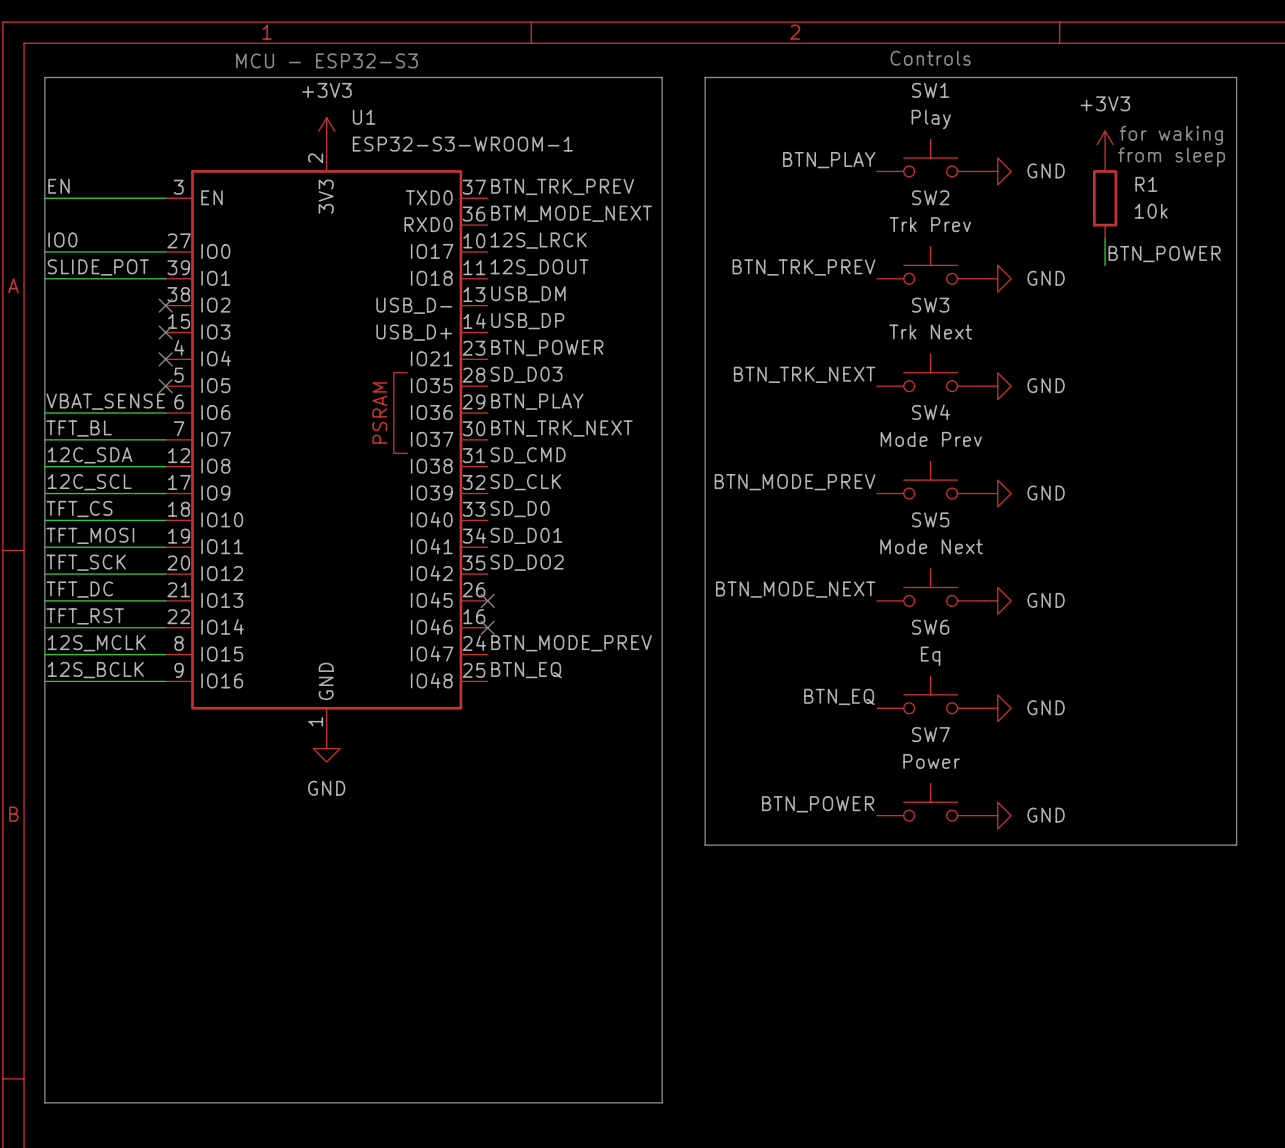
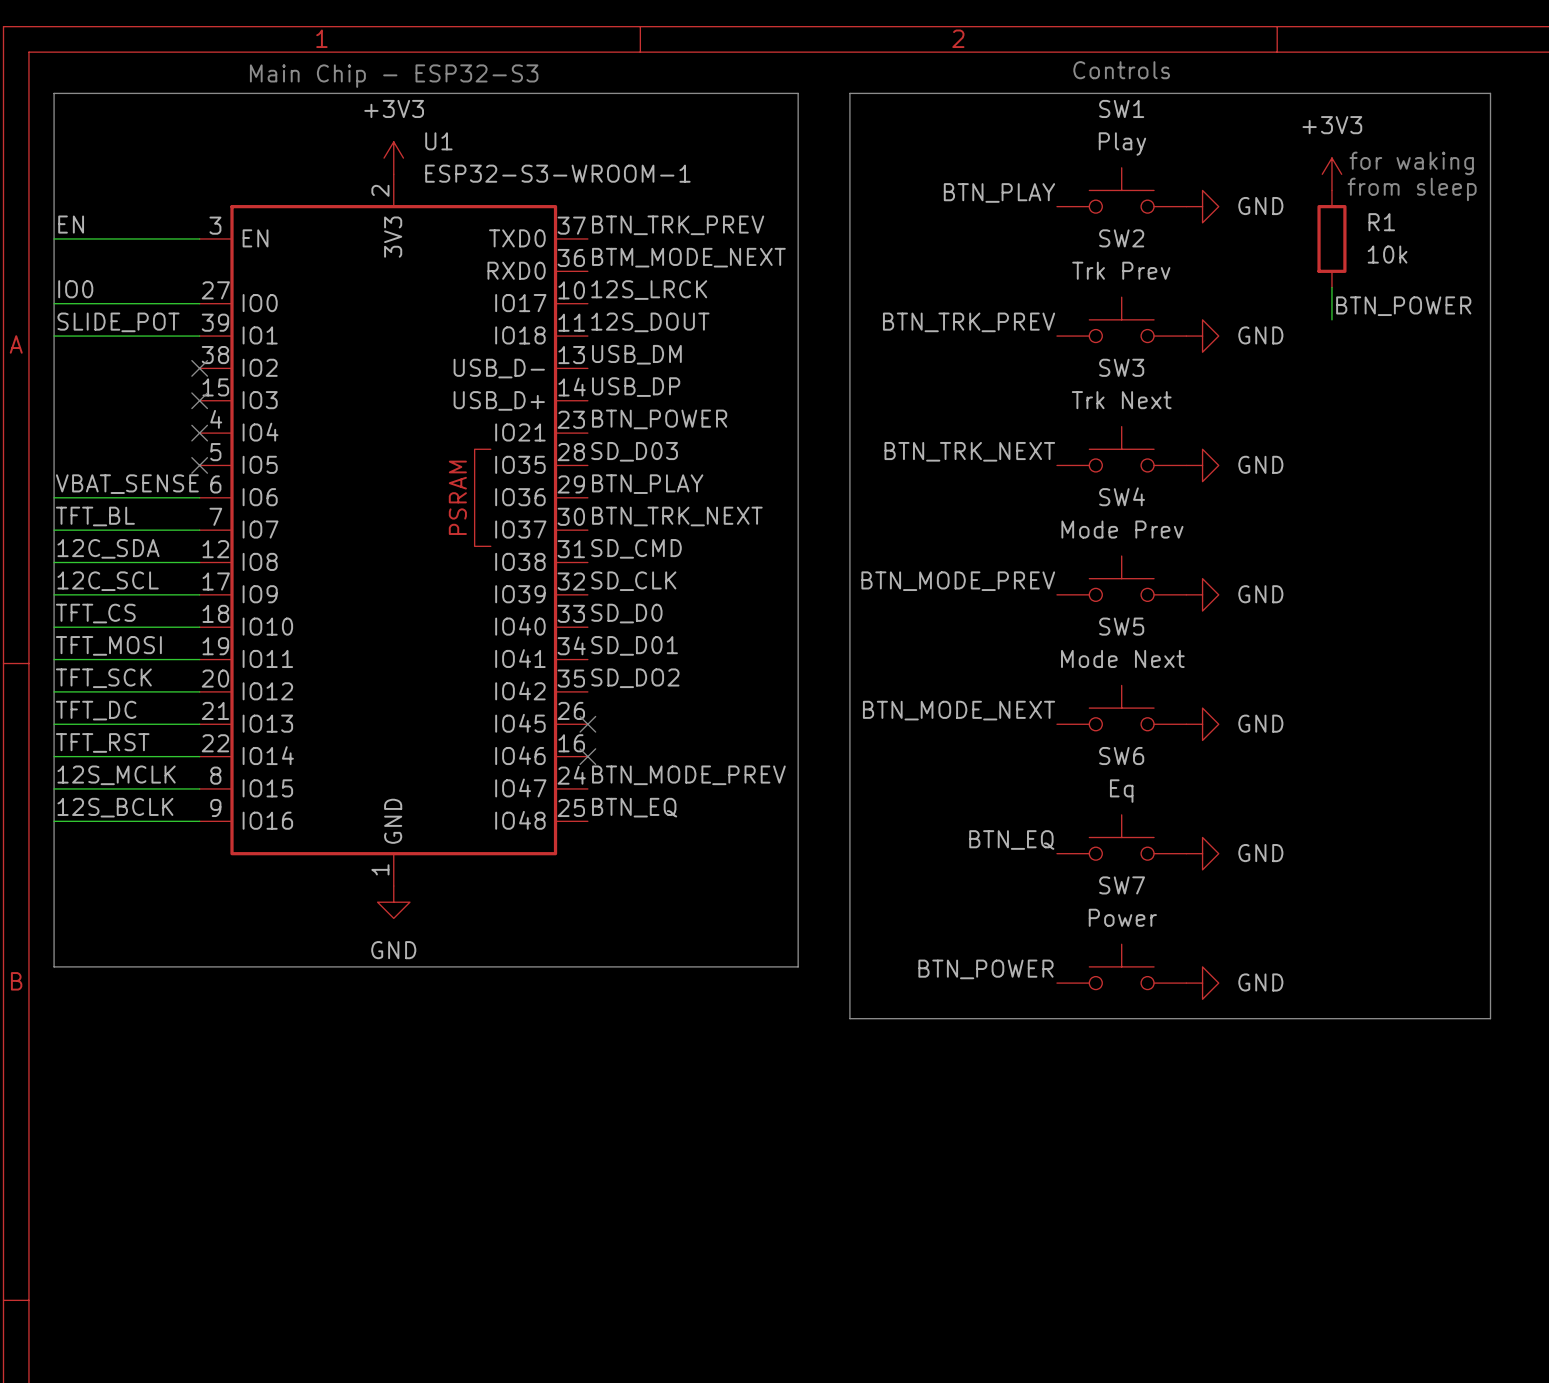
text: MCU - ESP32-S3 (327, 60) -> Main Chip - ESP32-S3 (394, 76)
line: (44, 802) (44, 1102) (662, 1102) (662, 802) -> (54, 966) (798, 966)

